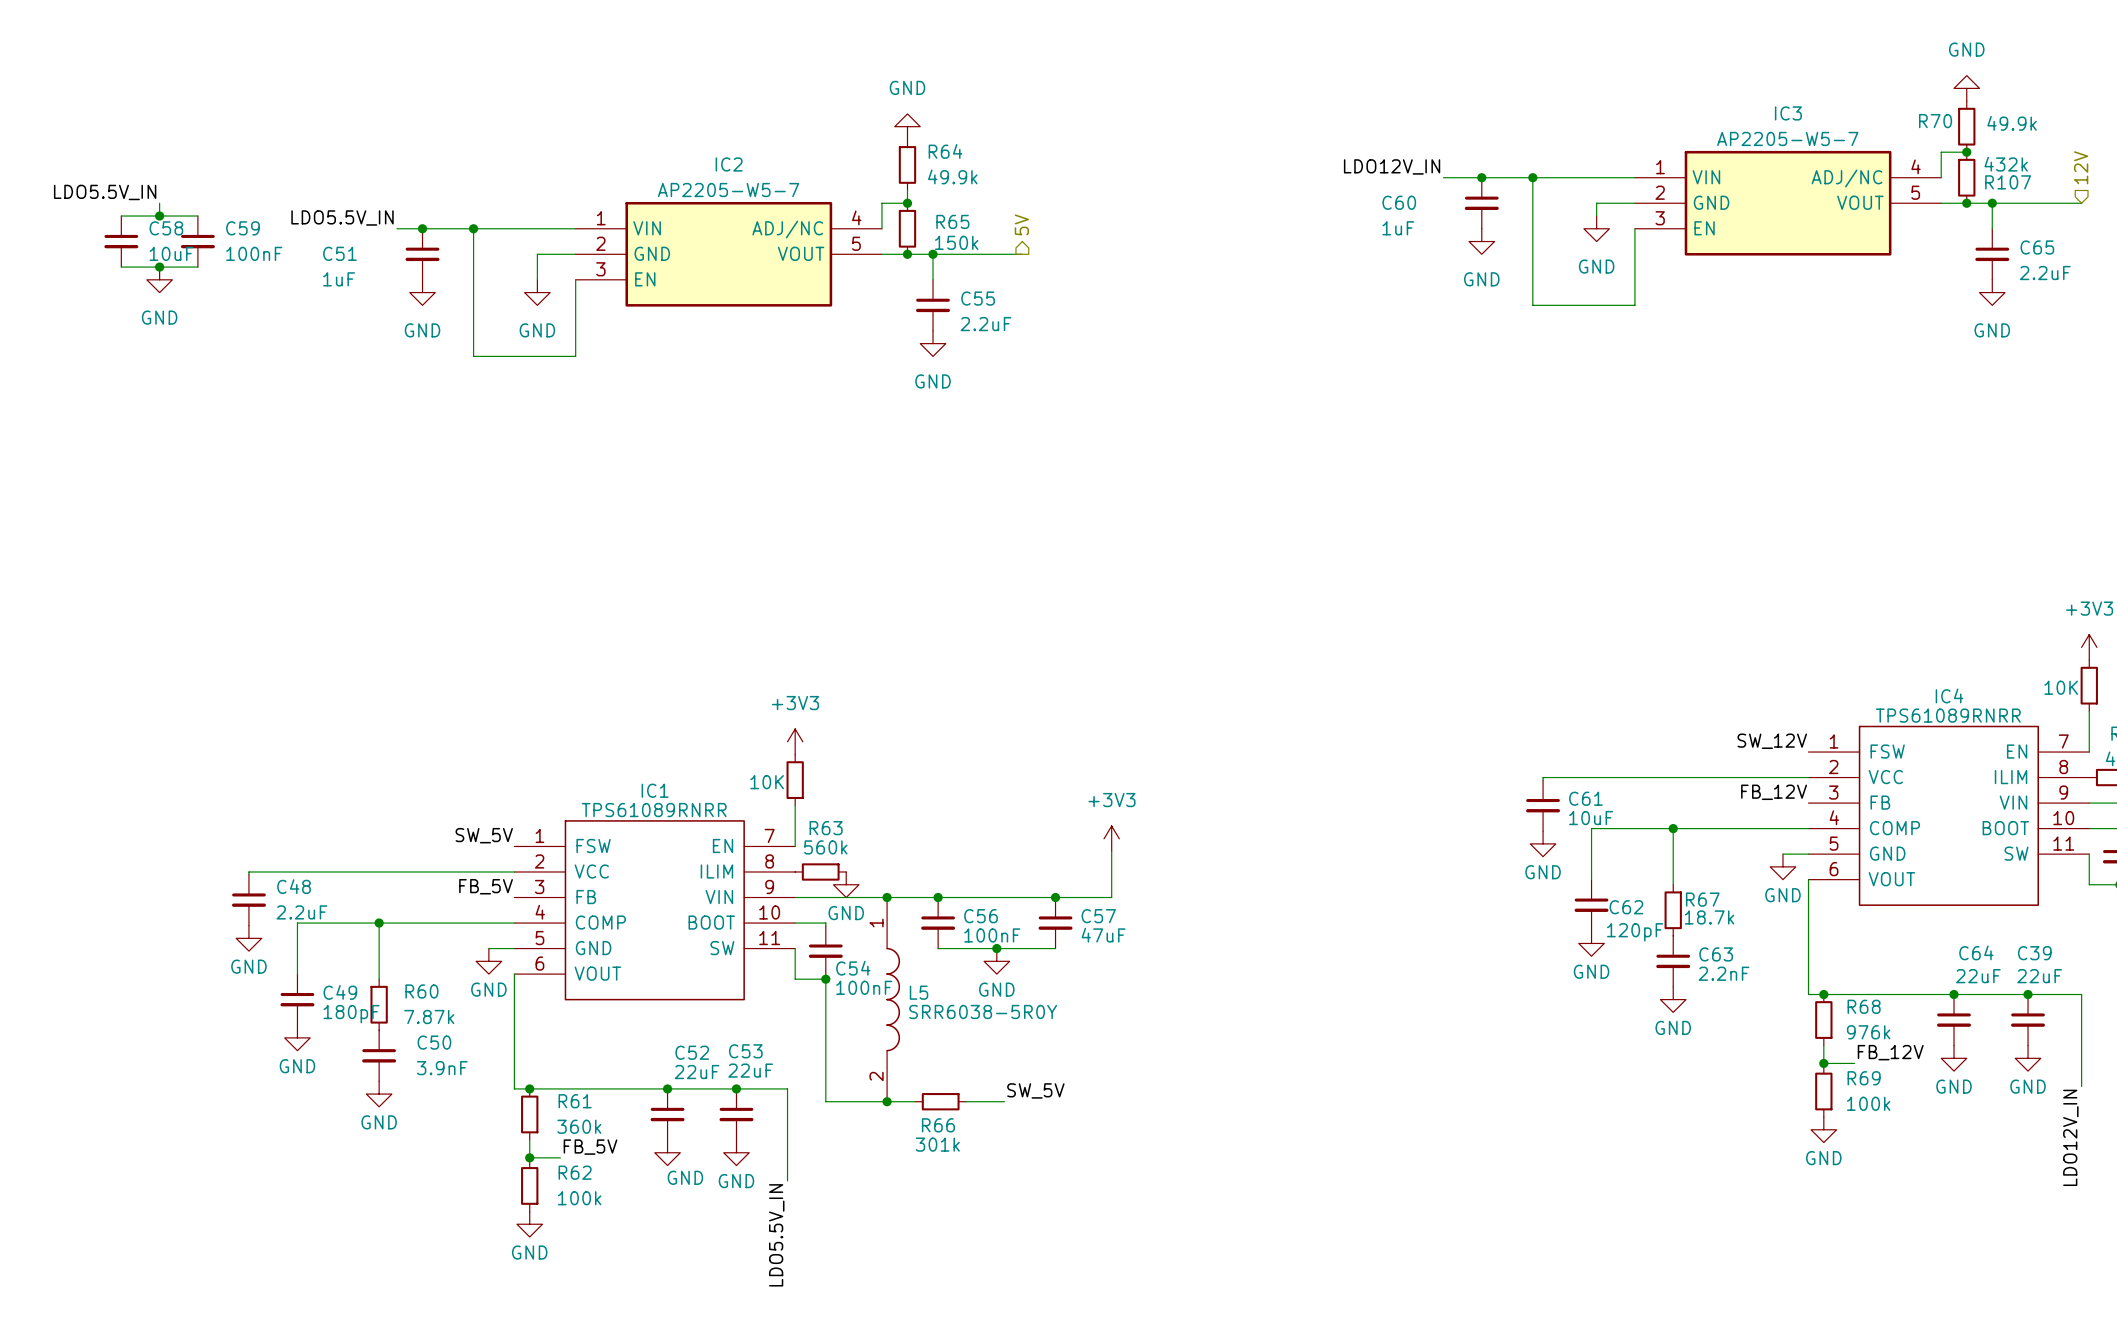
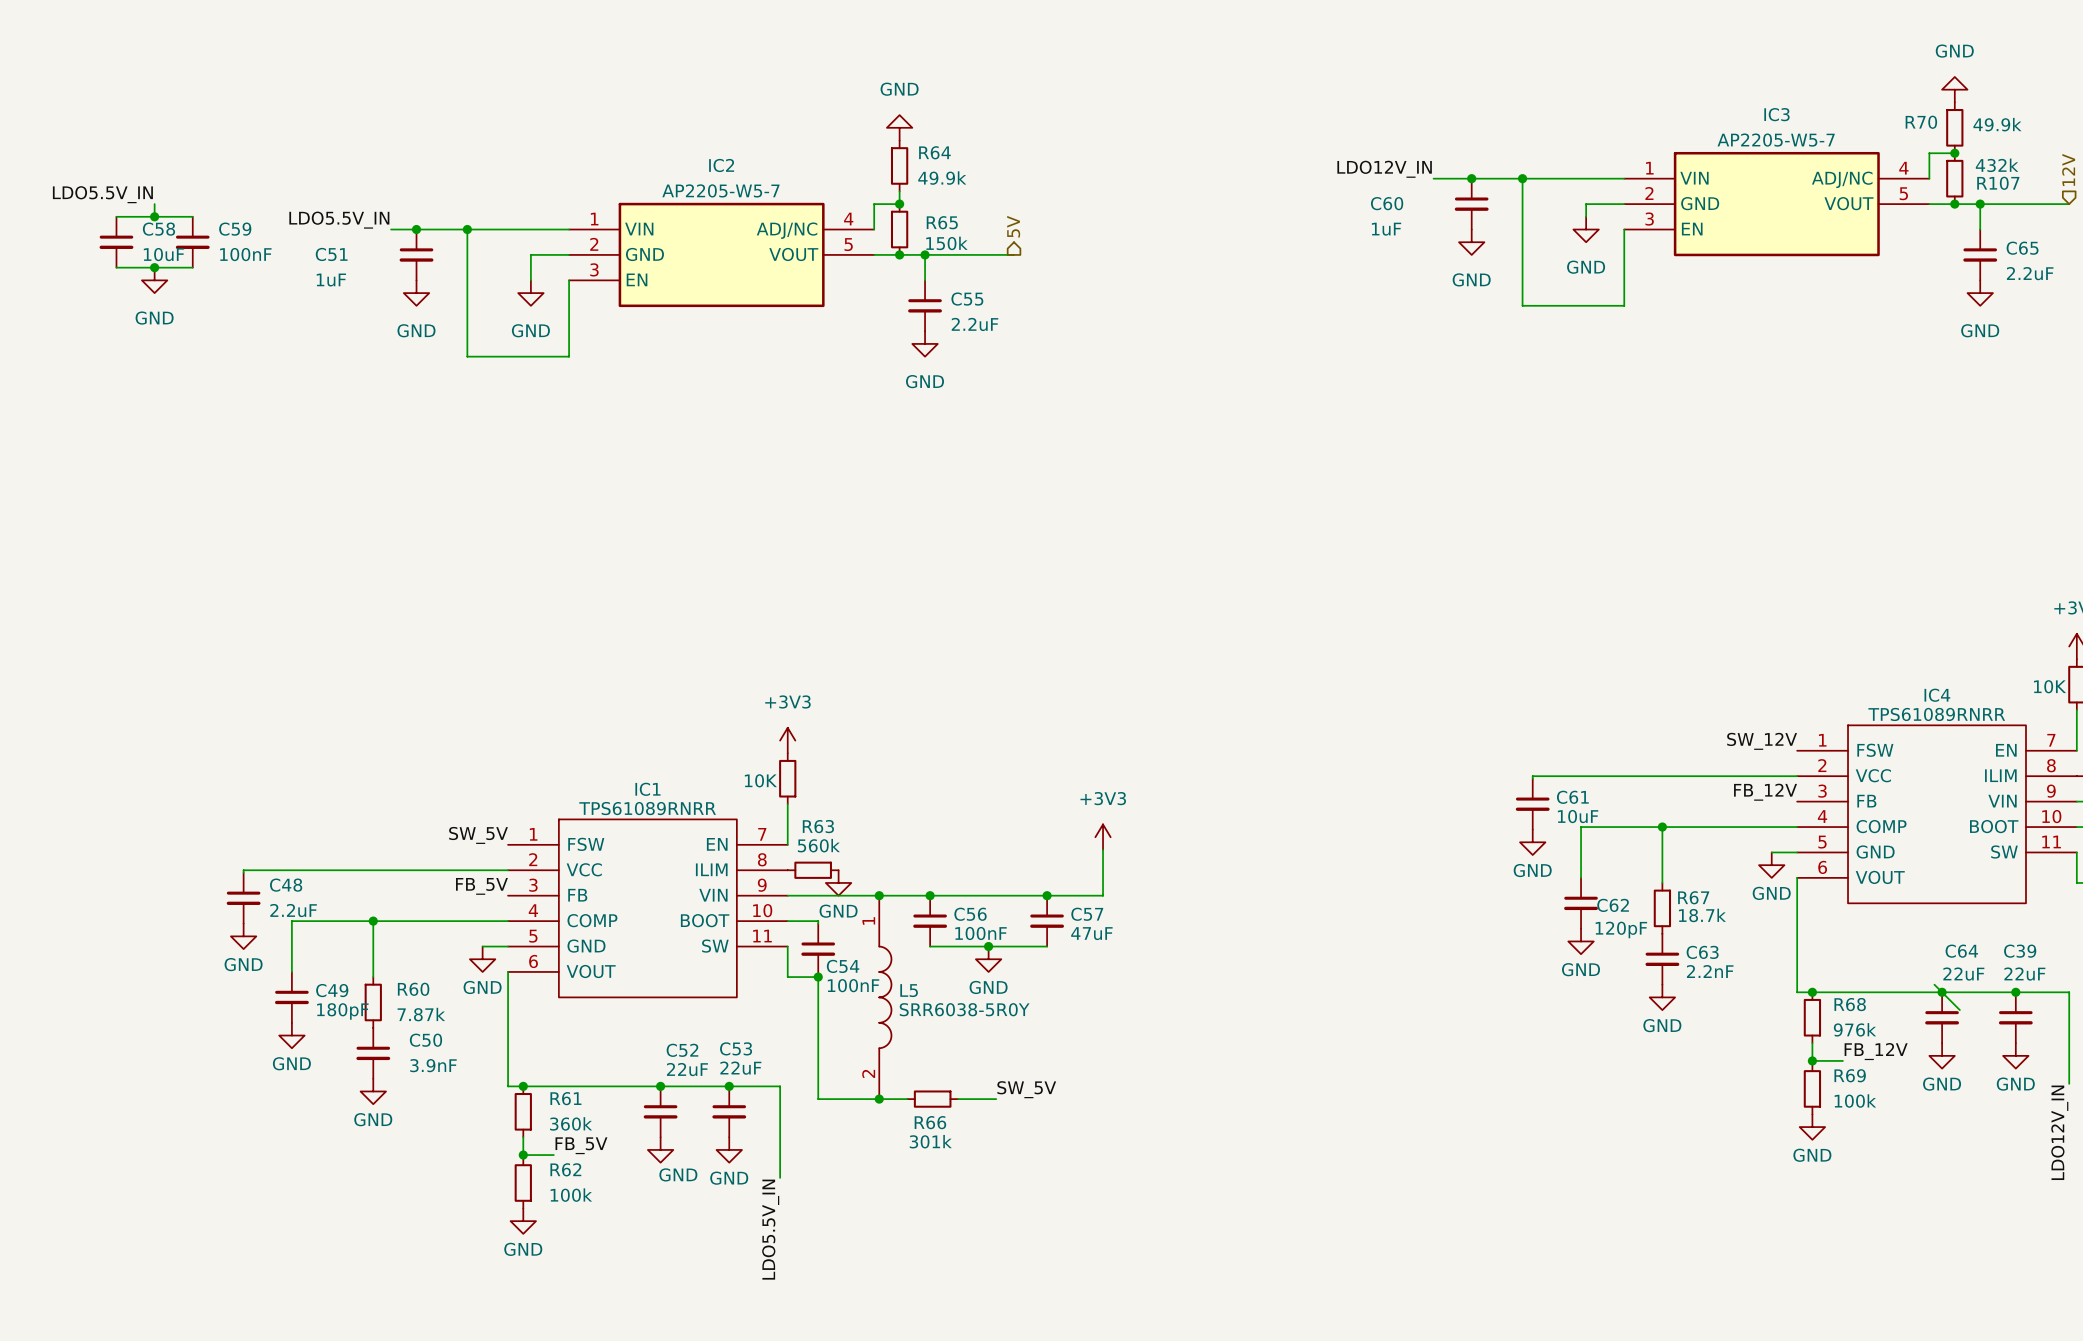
wire: none -> (1934, 984) (1959, 1010)

